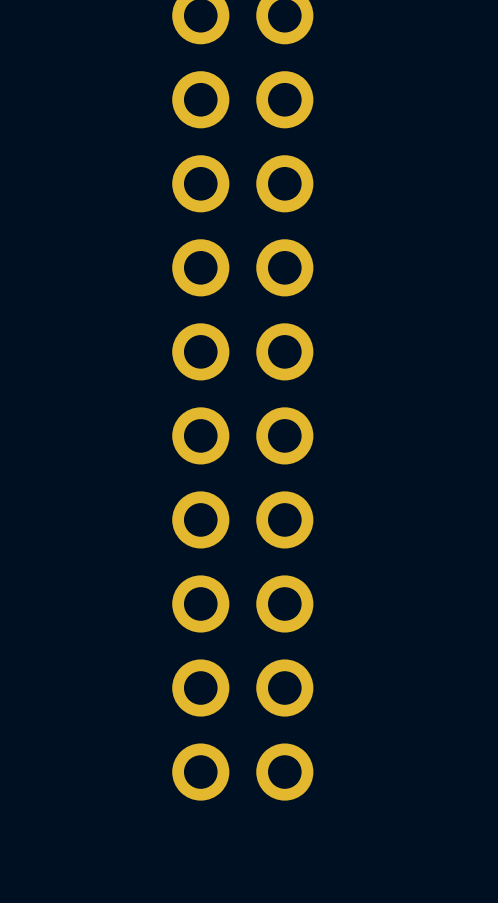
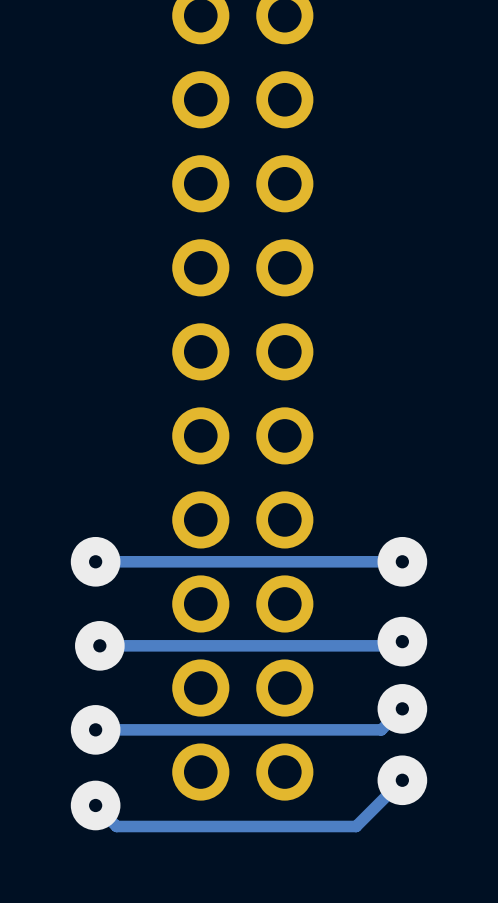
via: none -> (95, 561)
track: none -> (402, 561) (95, 561)
via: none -> (402, 561)
track: none -> (402, 641) (398, 645) (99, 645)
via: none -> (402, 641)
via: none -> (99, 645)
track: none -> (402, 708) (381, 729) (95, 729)
via: none -> (402, 708)
via: none -> (95, 729)
track: none -> (402, 780) (356, 826) (116, 826) (95, 805)
via: none -> (402, 780)
via: none -> (95, 805)

